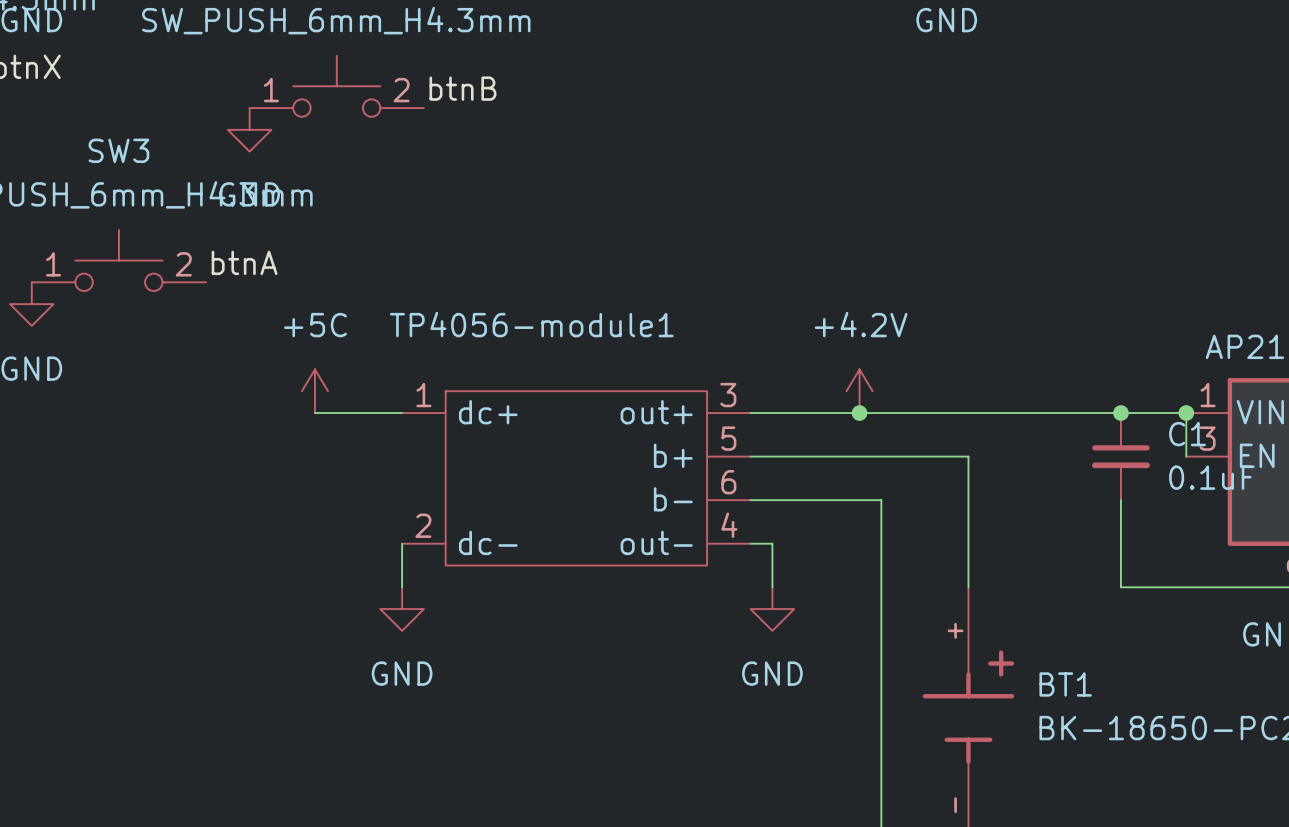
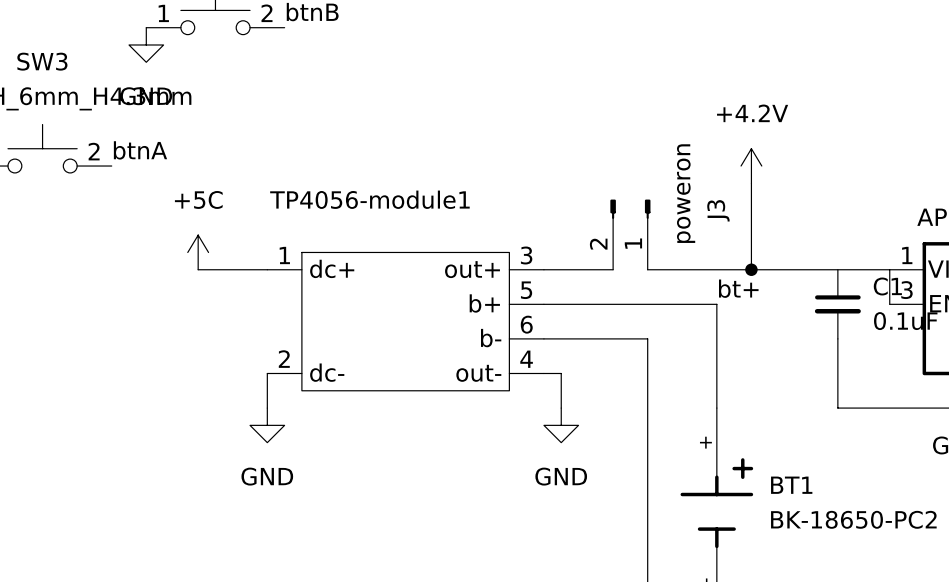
wire: none -> (751, 183) (751, 269)
J3: none -> poweron (630, 234)
power symbol position: +4.2V (859, 391) -> +4.2V (751, 166)
wire: (837, 413) (881, 413) -> none
junction: (859, 413) -> none
junction: none -> (751, 269)
junction: (1120, 413) -> none
junction: (1186, 413) -> none
label: none -> bt+ (738, 288)

